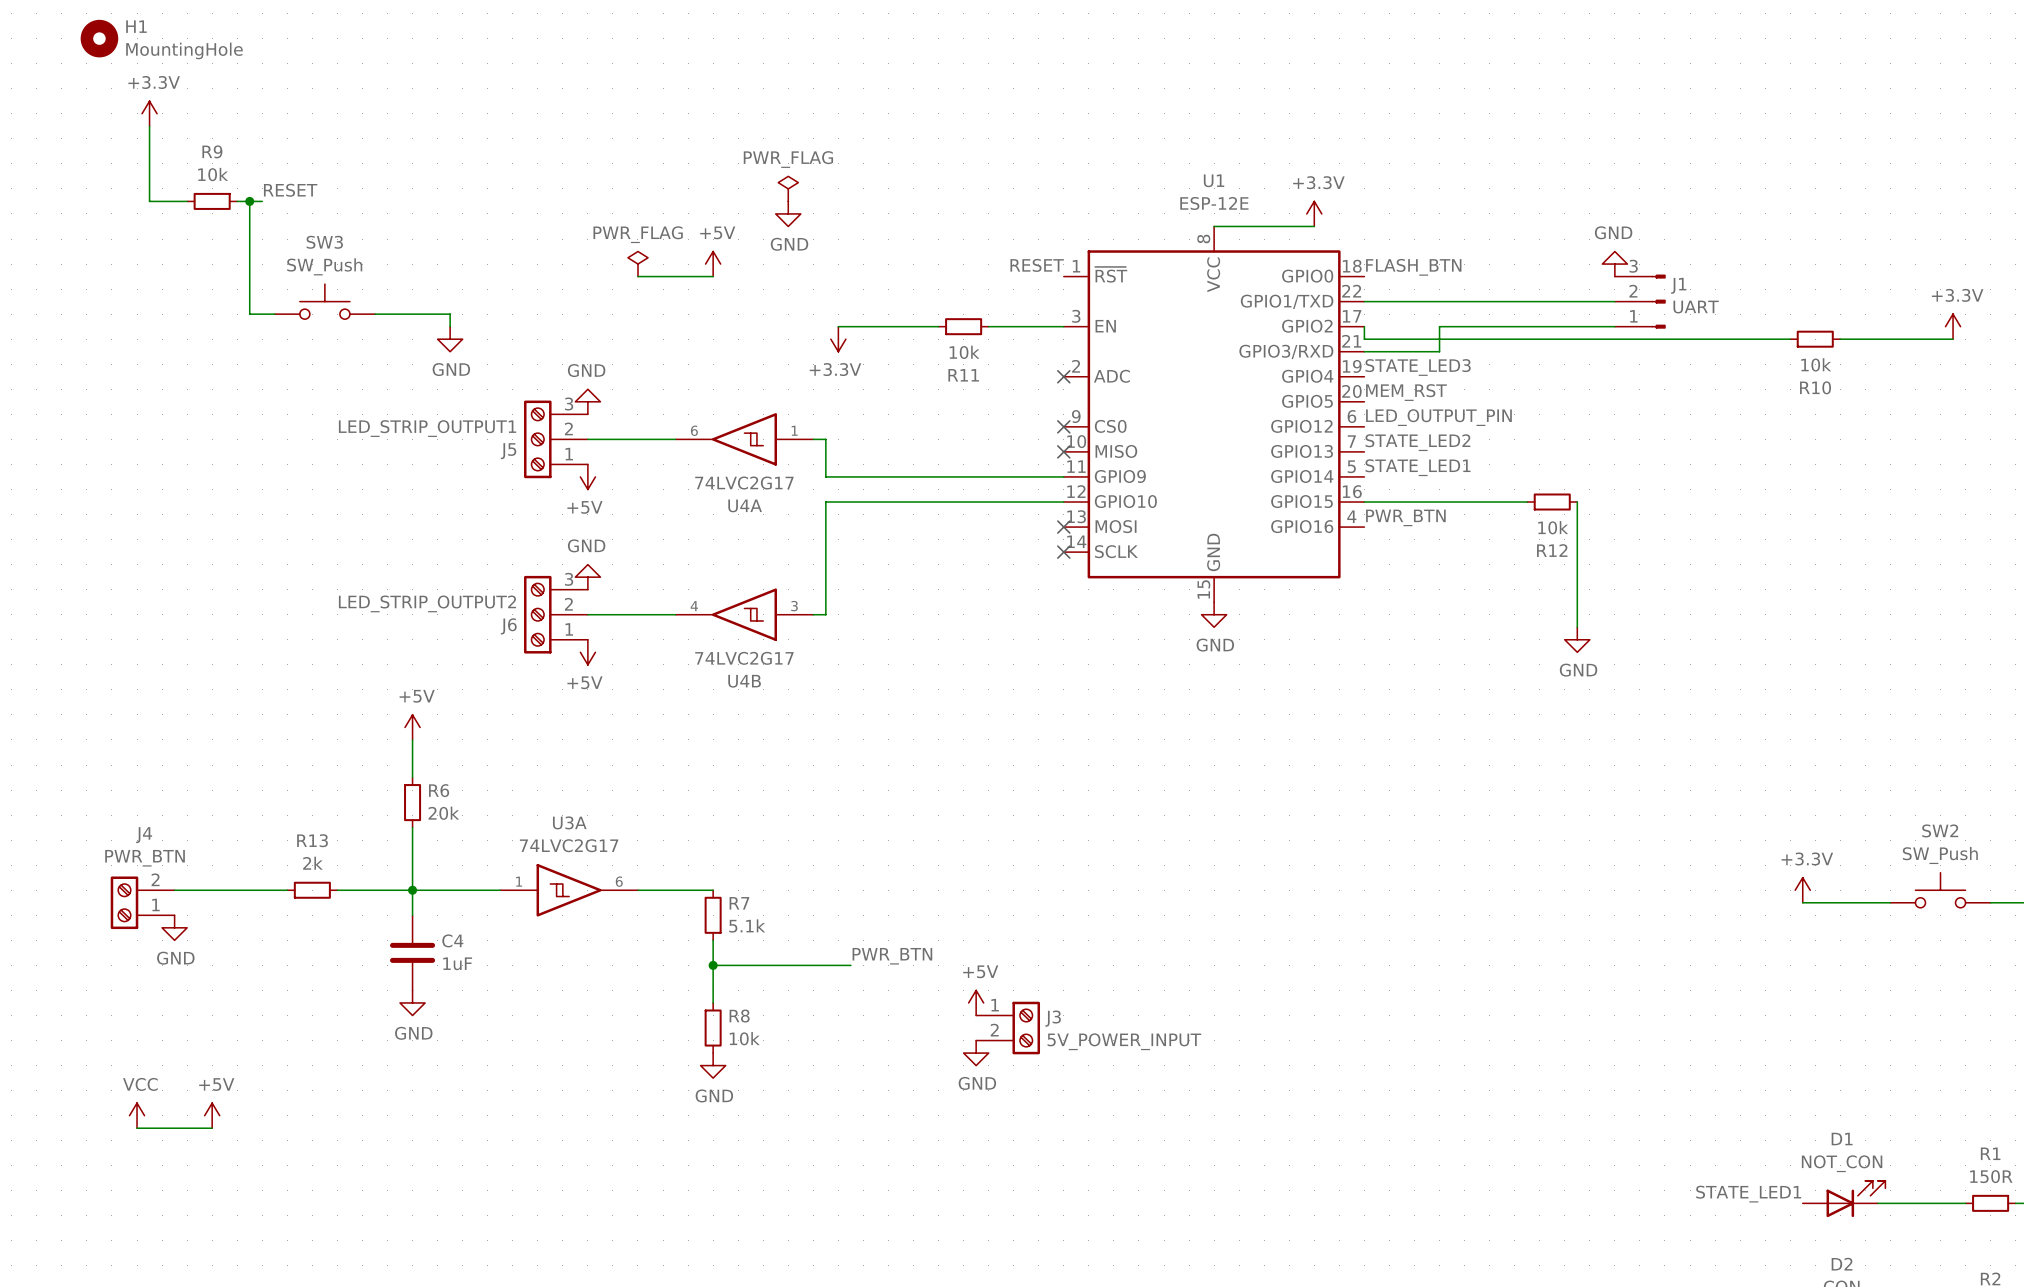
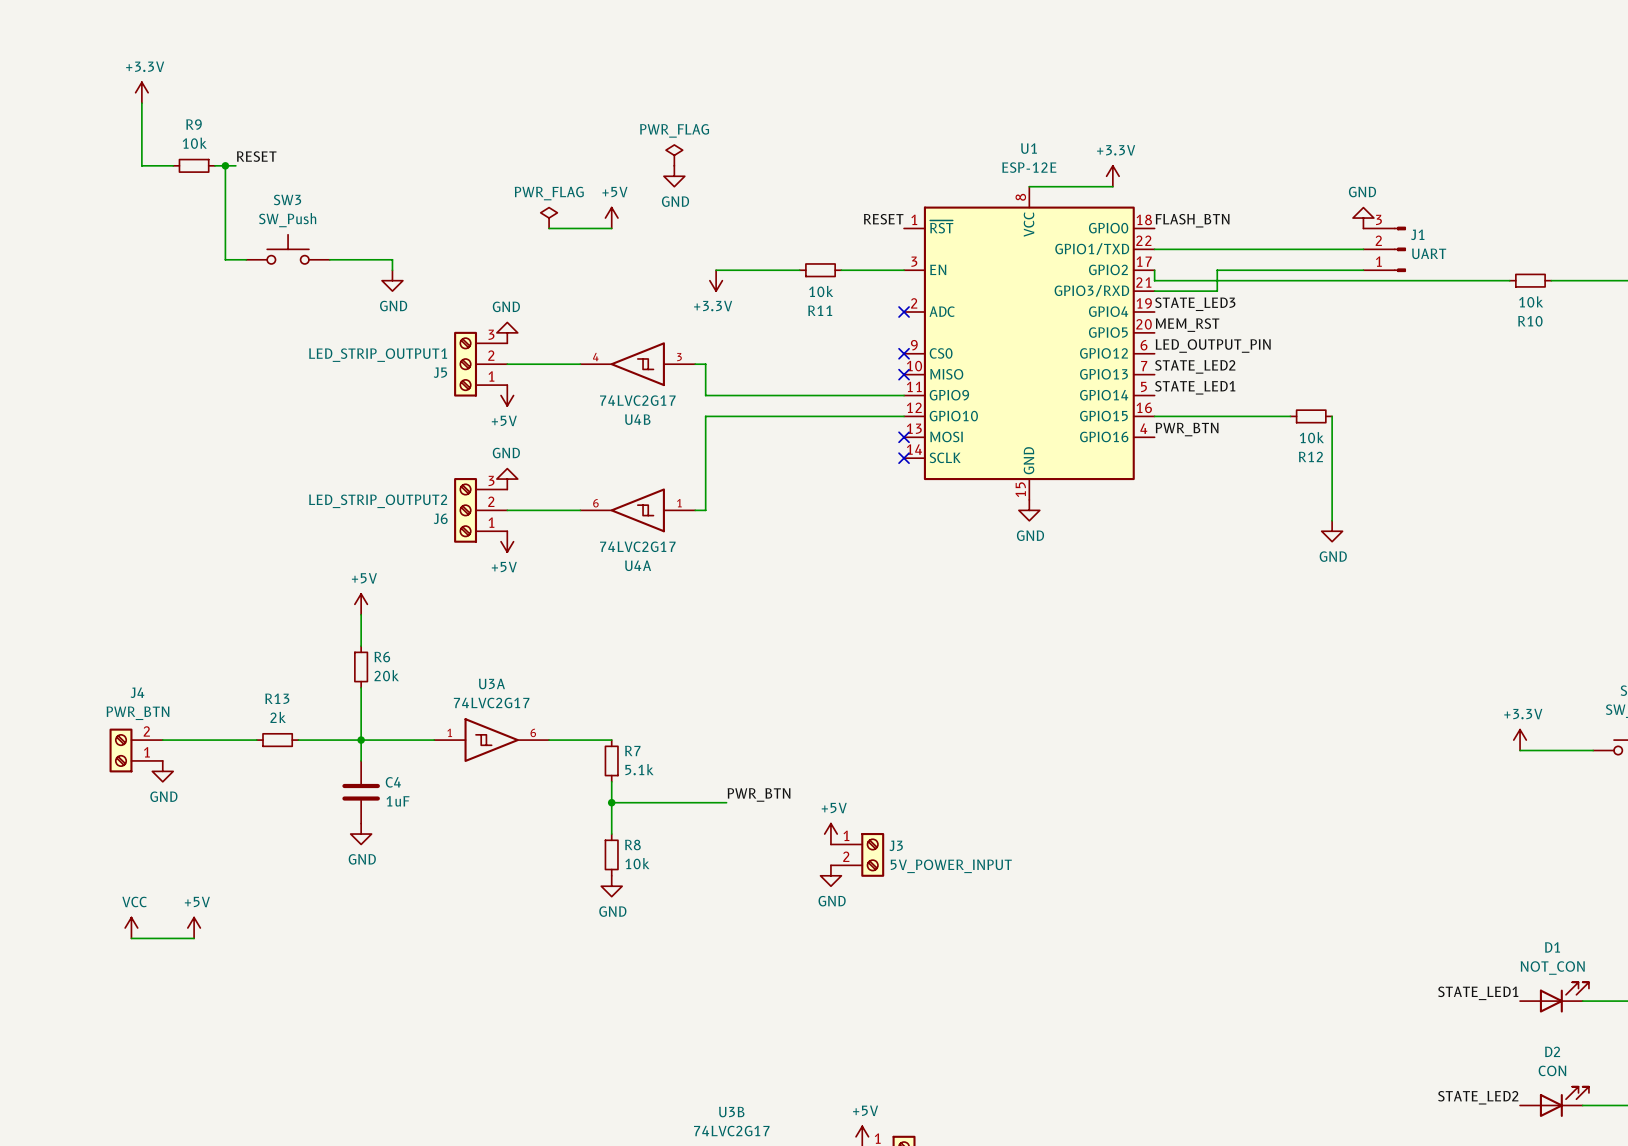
H1: MountingHole (99, 38) -> none
U4A position: (744, 439) -> (637, 510)
U4B position: (744, 614) -> (637, 364)

